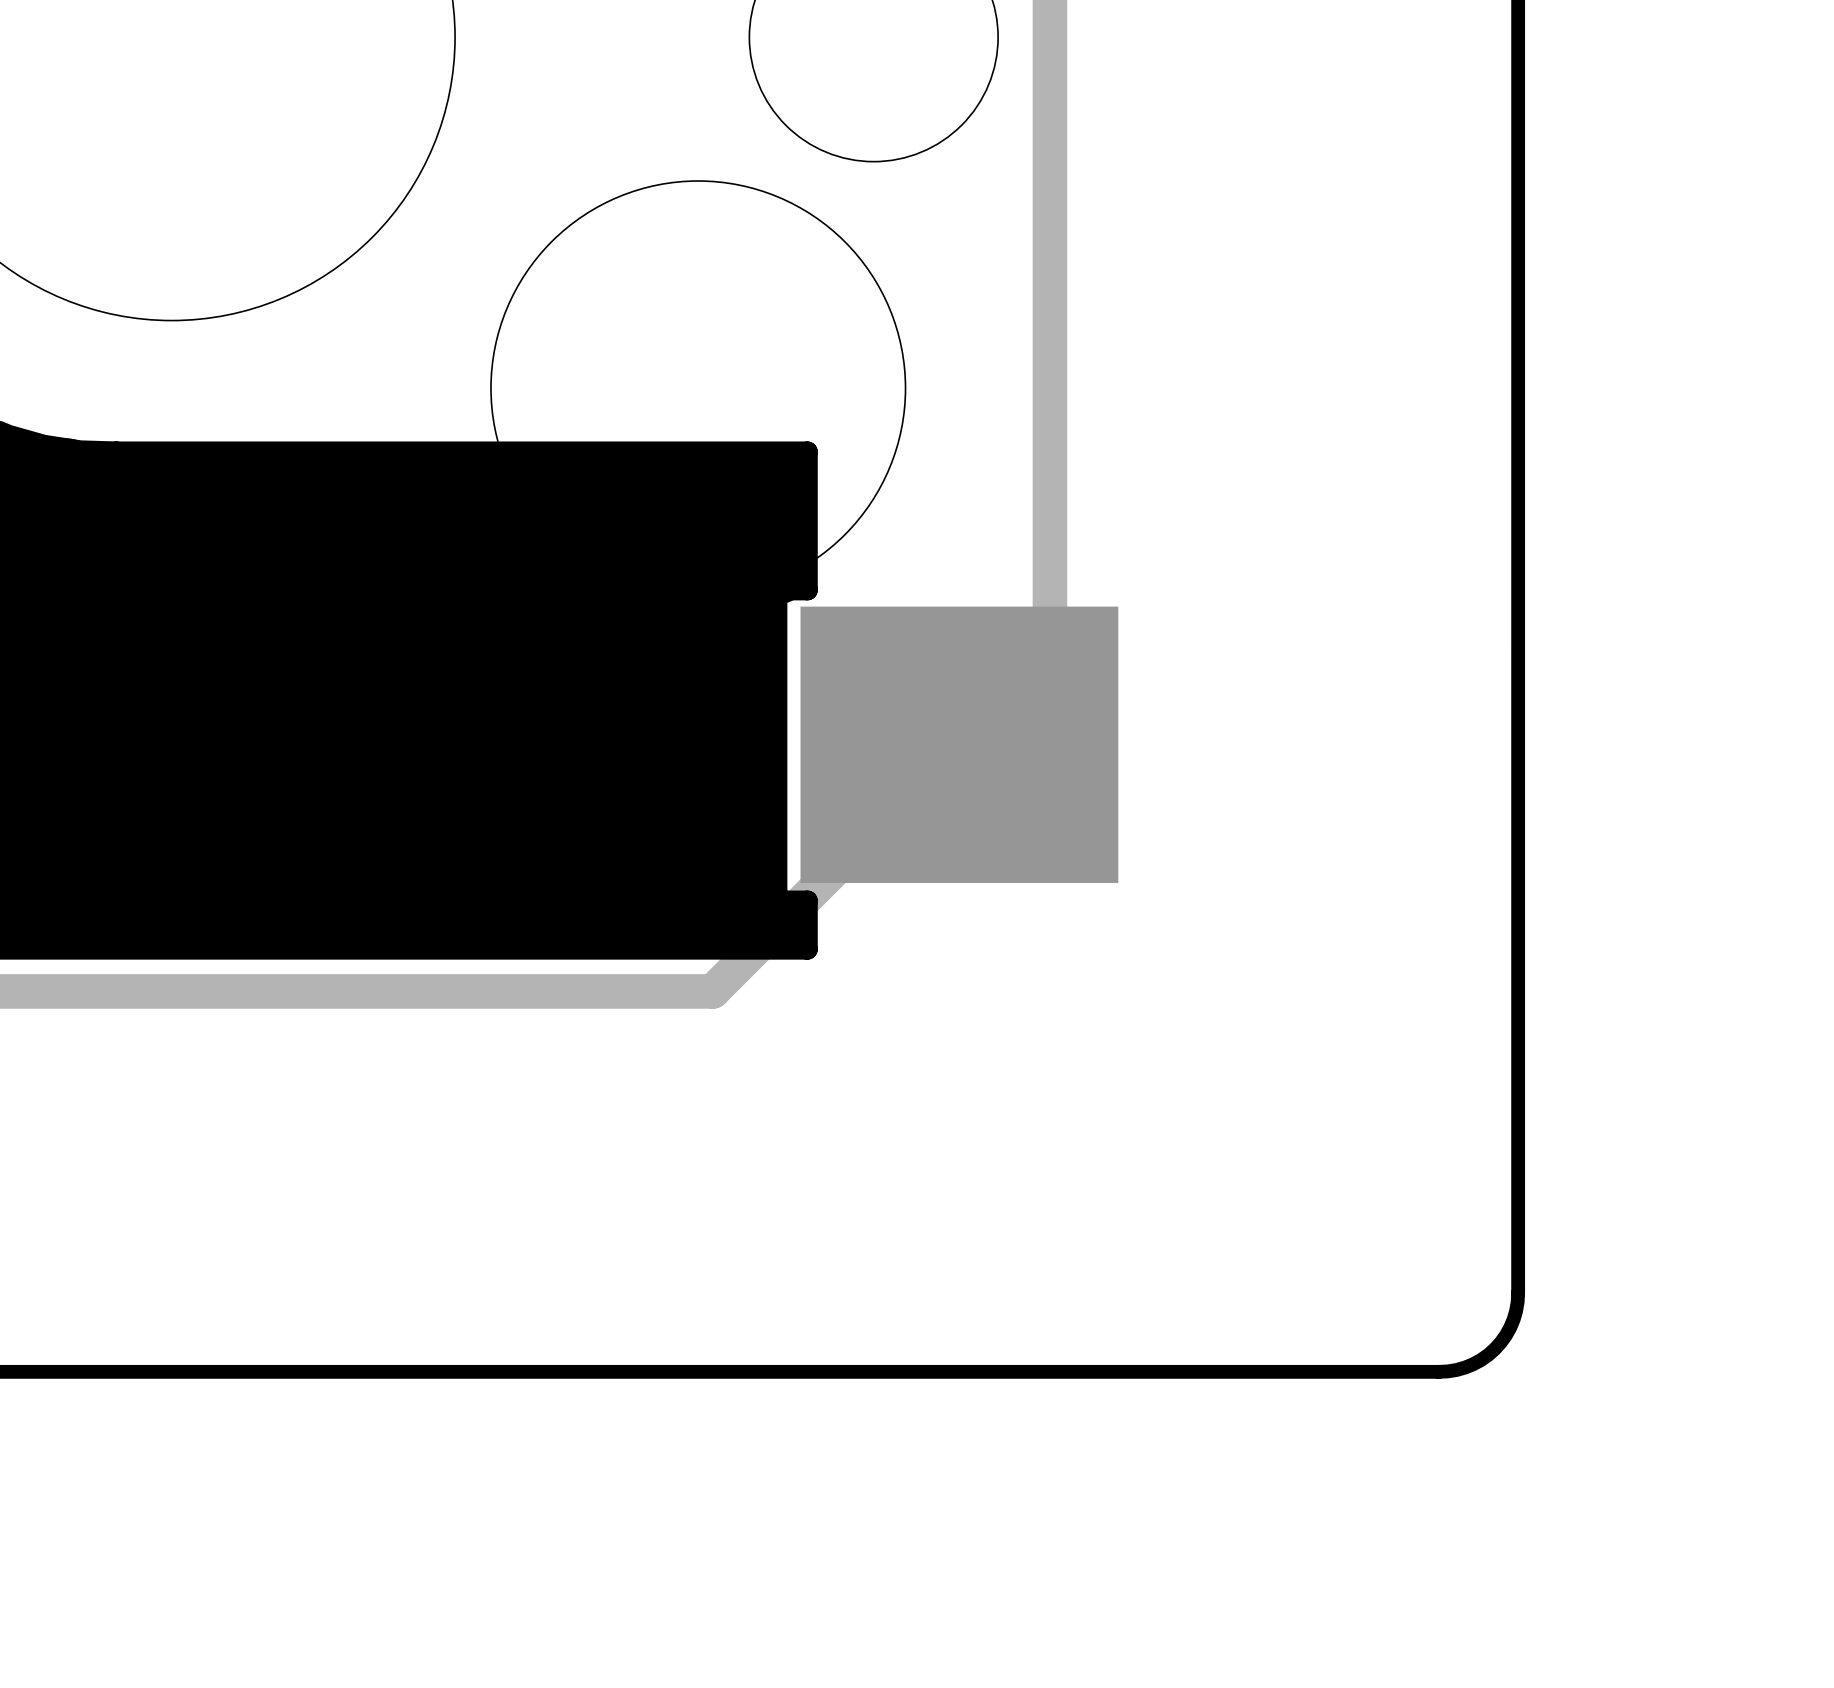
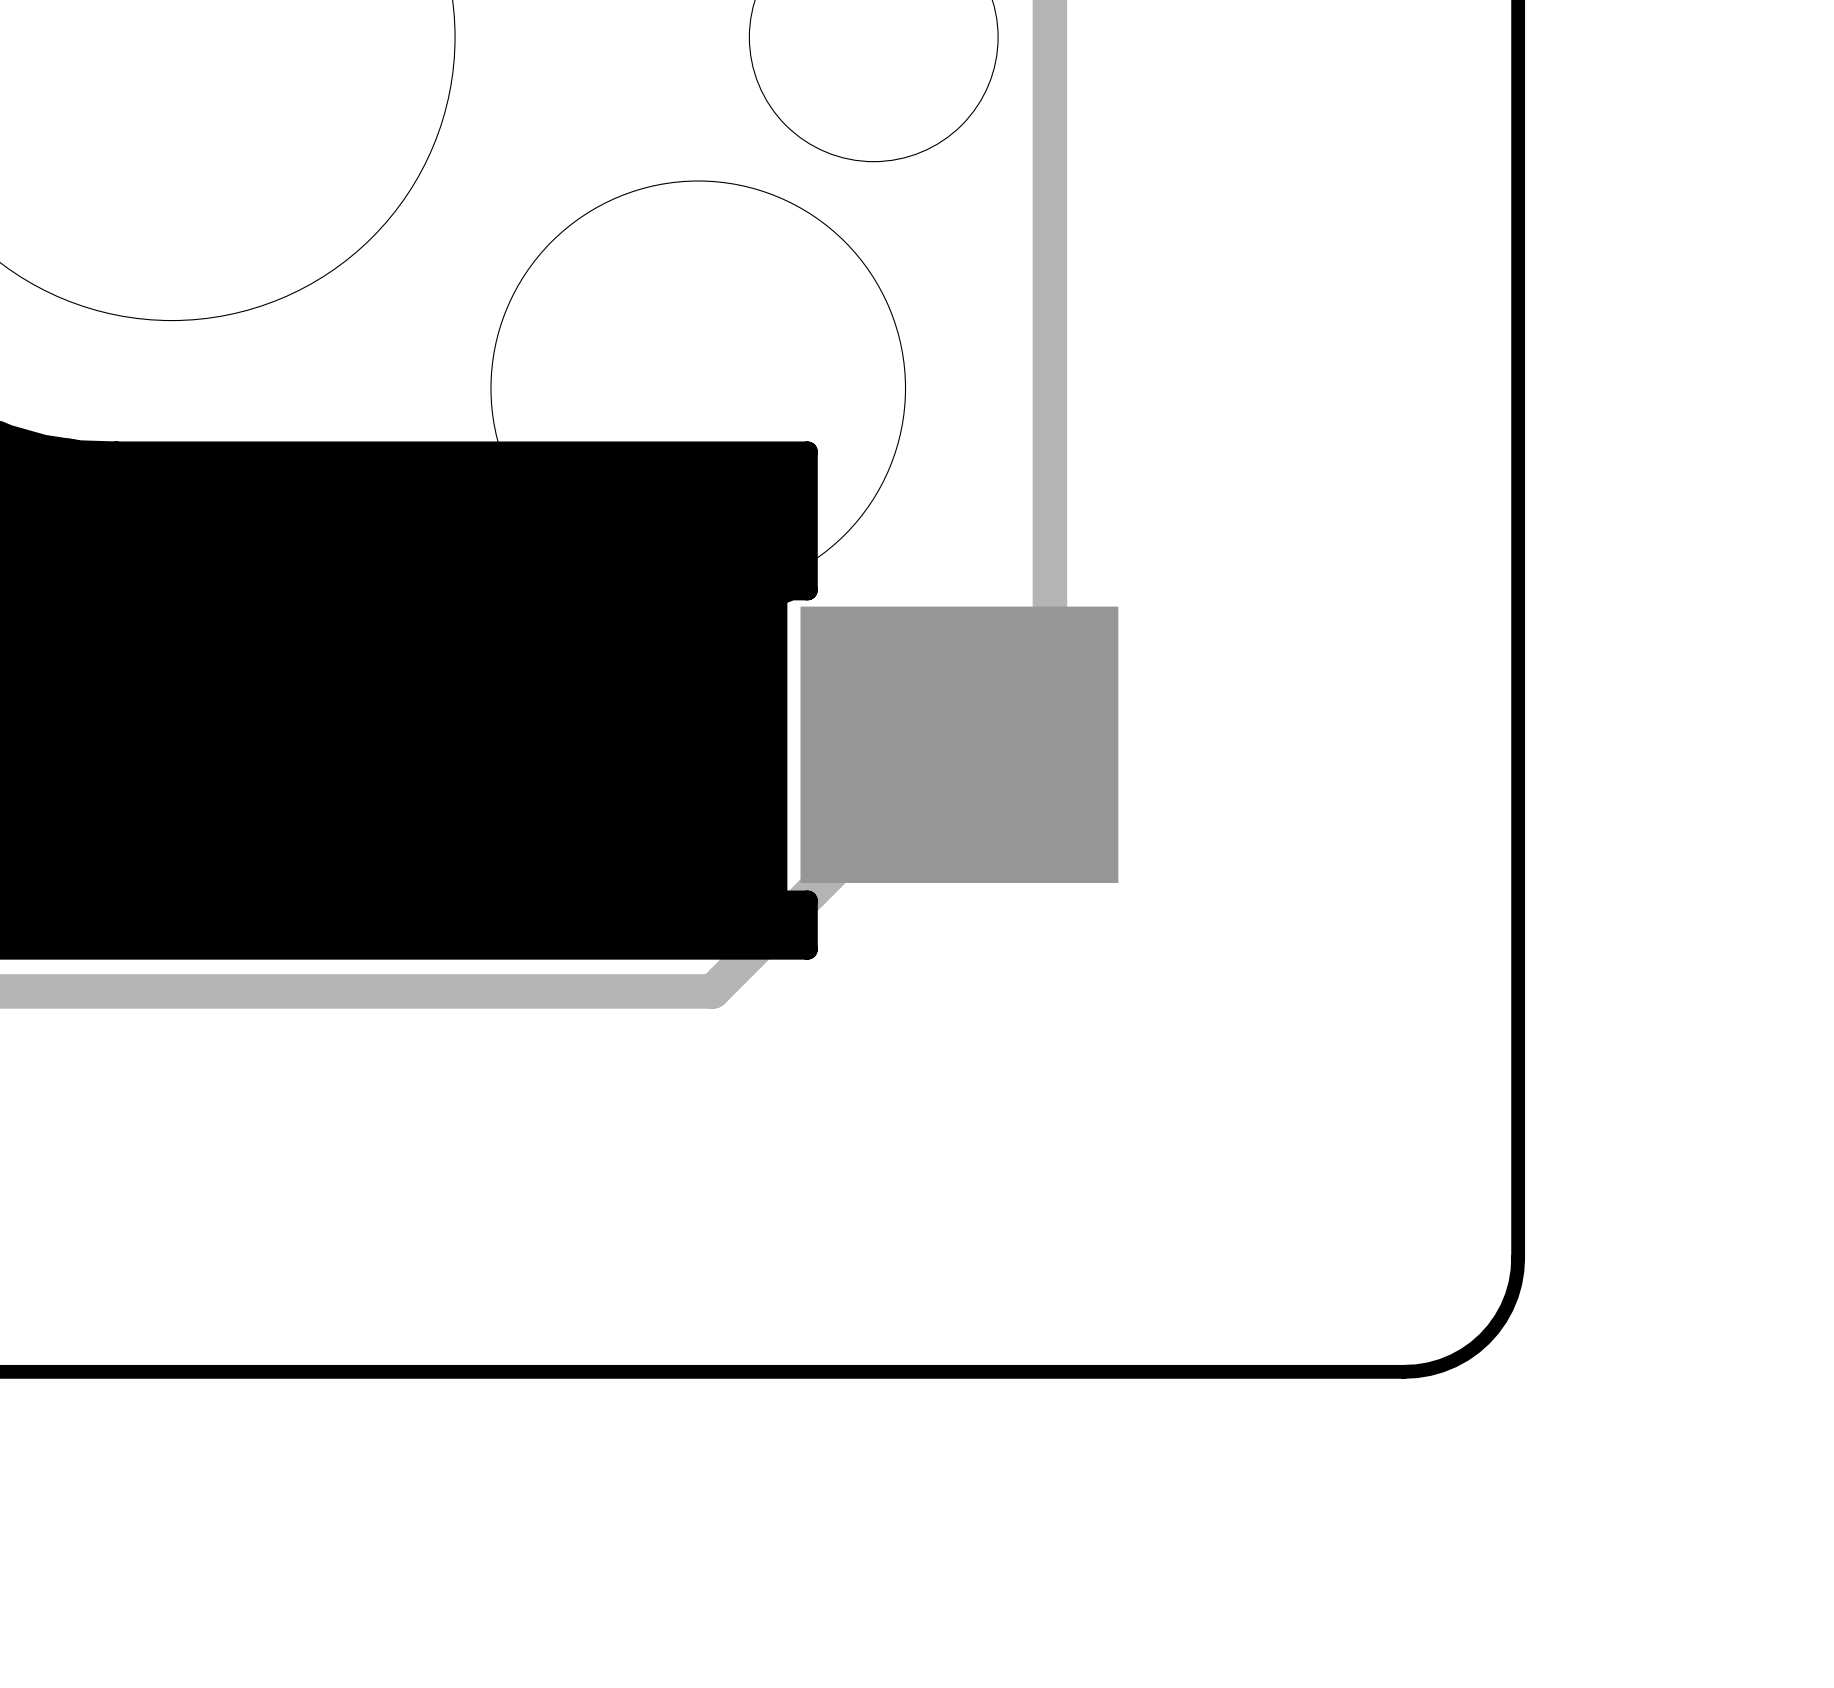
board edge: (1518, 1258) (1516, 1310) (1505, 1335) (1494, 1349) (1473, 1364) (1456, 1370) (1403, 1371) -> (1518, 1258) (1515, 1283) (1506, 1307) (1484, 1338) (1464, 1354) (1441, 1365) (1403, 1371)

